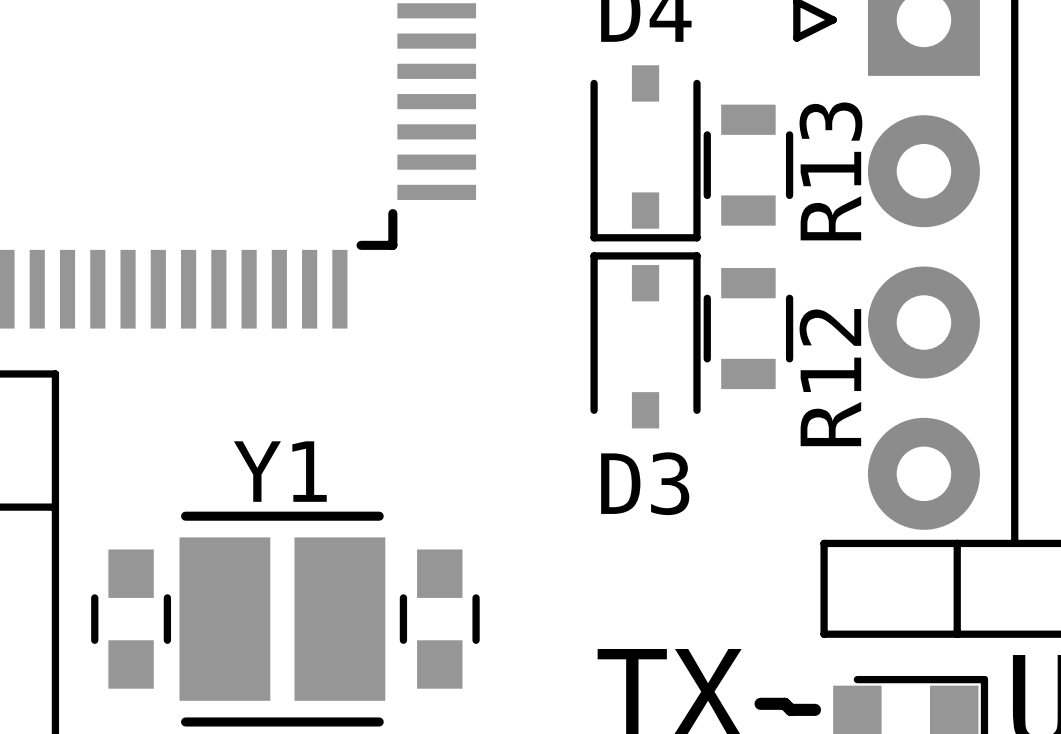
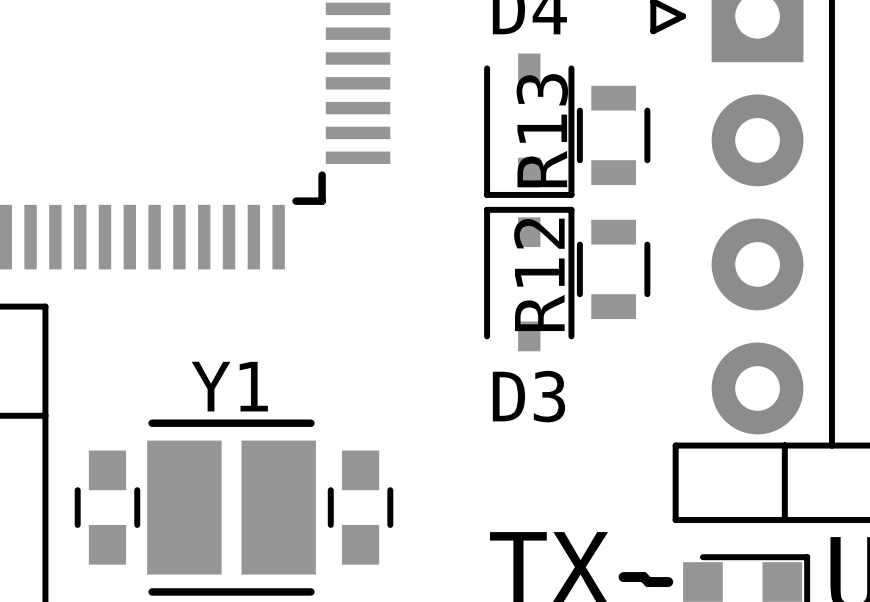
R13 name position: R13 (830, 171) -> R13 (542, 130)
R12 name position: R12 (830, 377) -> R12 (539, 274)

